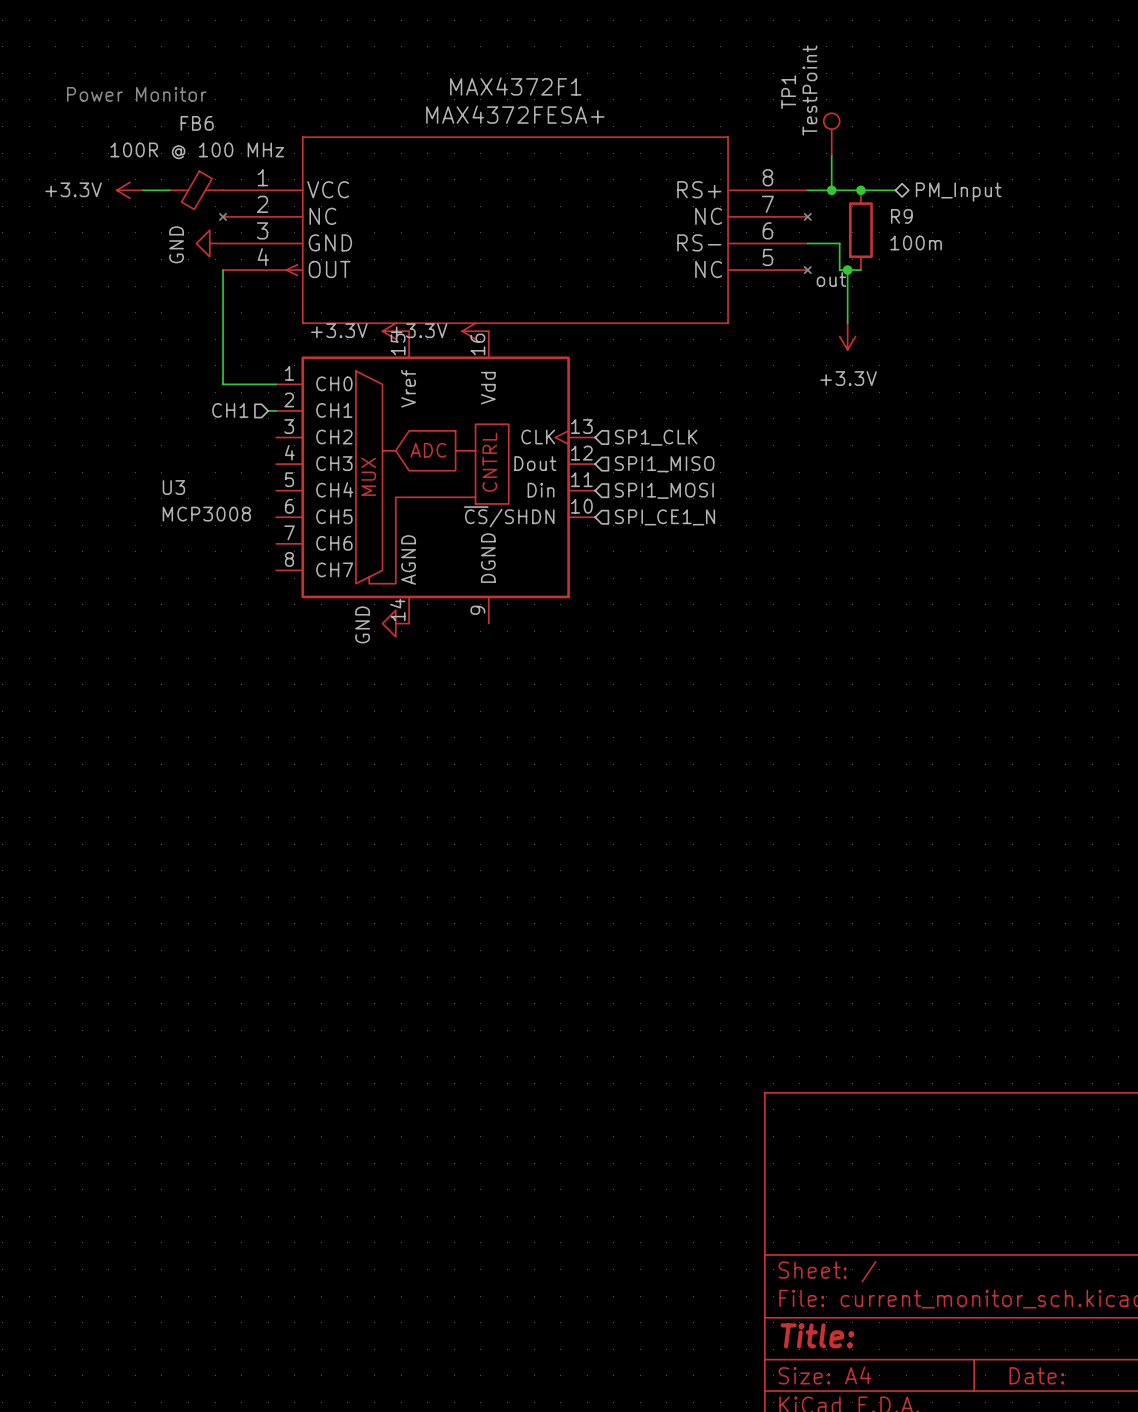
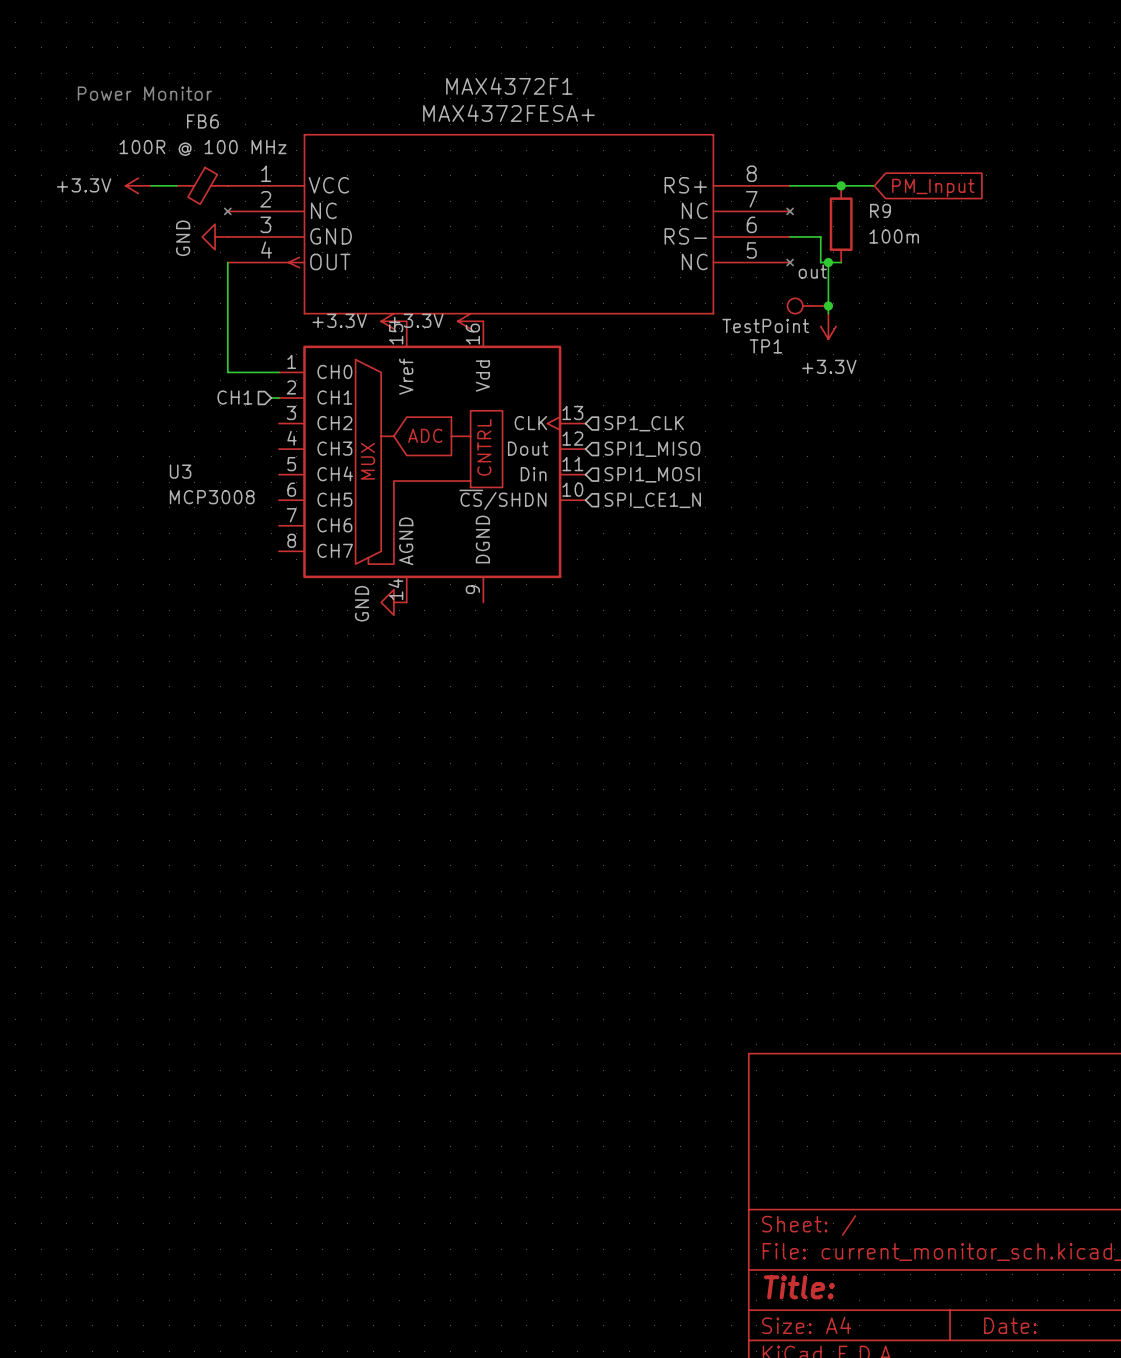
TP1 rotation: 0° (831, 121) -> 90° counterclockwise (795, 305)
TP1 position: (831, 134) -> (807, 305)
wire: (831, 155) (831, 190) -> none
junction: (831, 190) -> none
global label: none -> PM_Input (933, 187)
hierarchical label: PM_Input (958, 192) -> none
junction: none -> (828, 305)

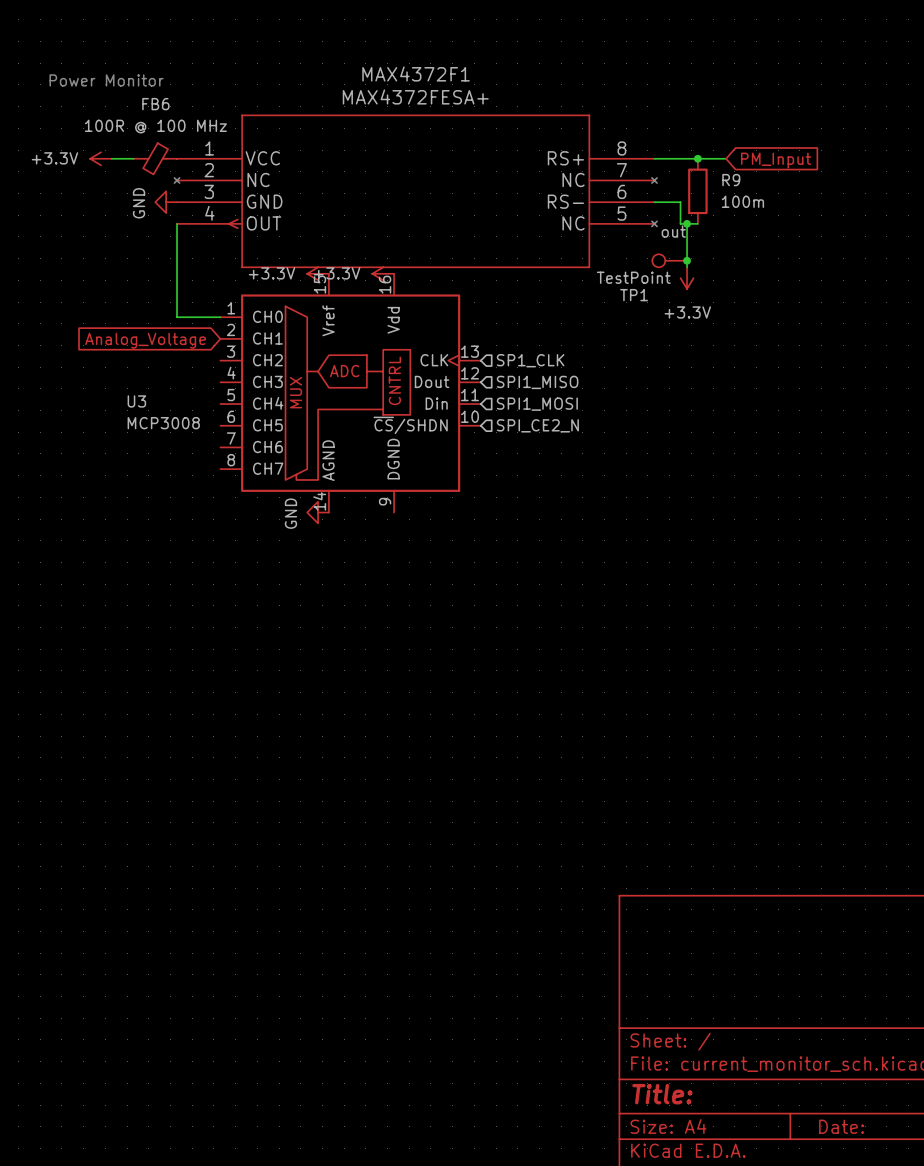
hierarchical label: CH1 (234, 397) -> none
wire: (271, 397) (278, 397) -> none
global label: none -> Analog_Voltage (145, 340)
hierarchical label: SPI_CE1_N (652, 500) -> SPI_CE2_N (537, 425)

